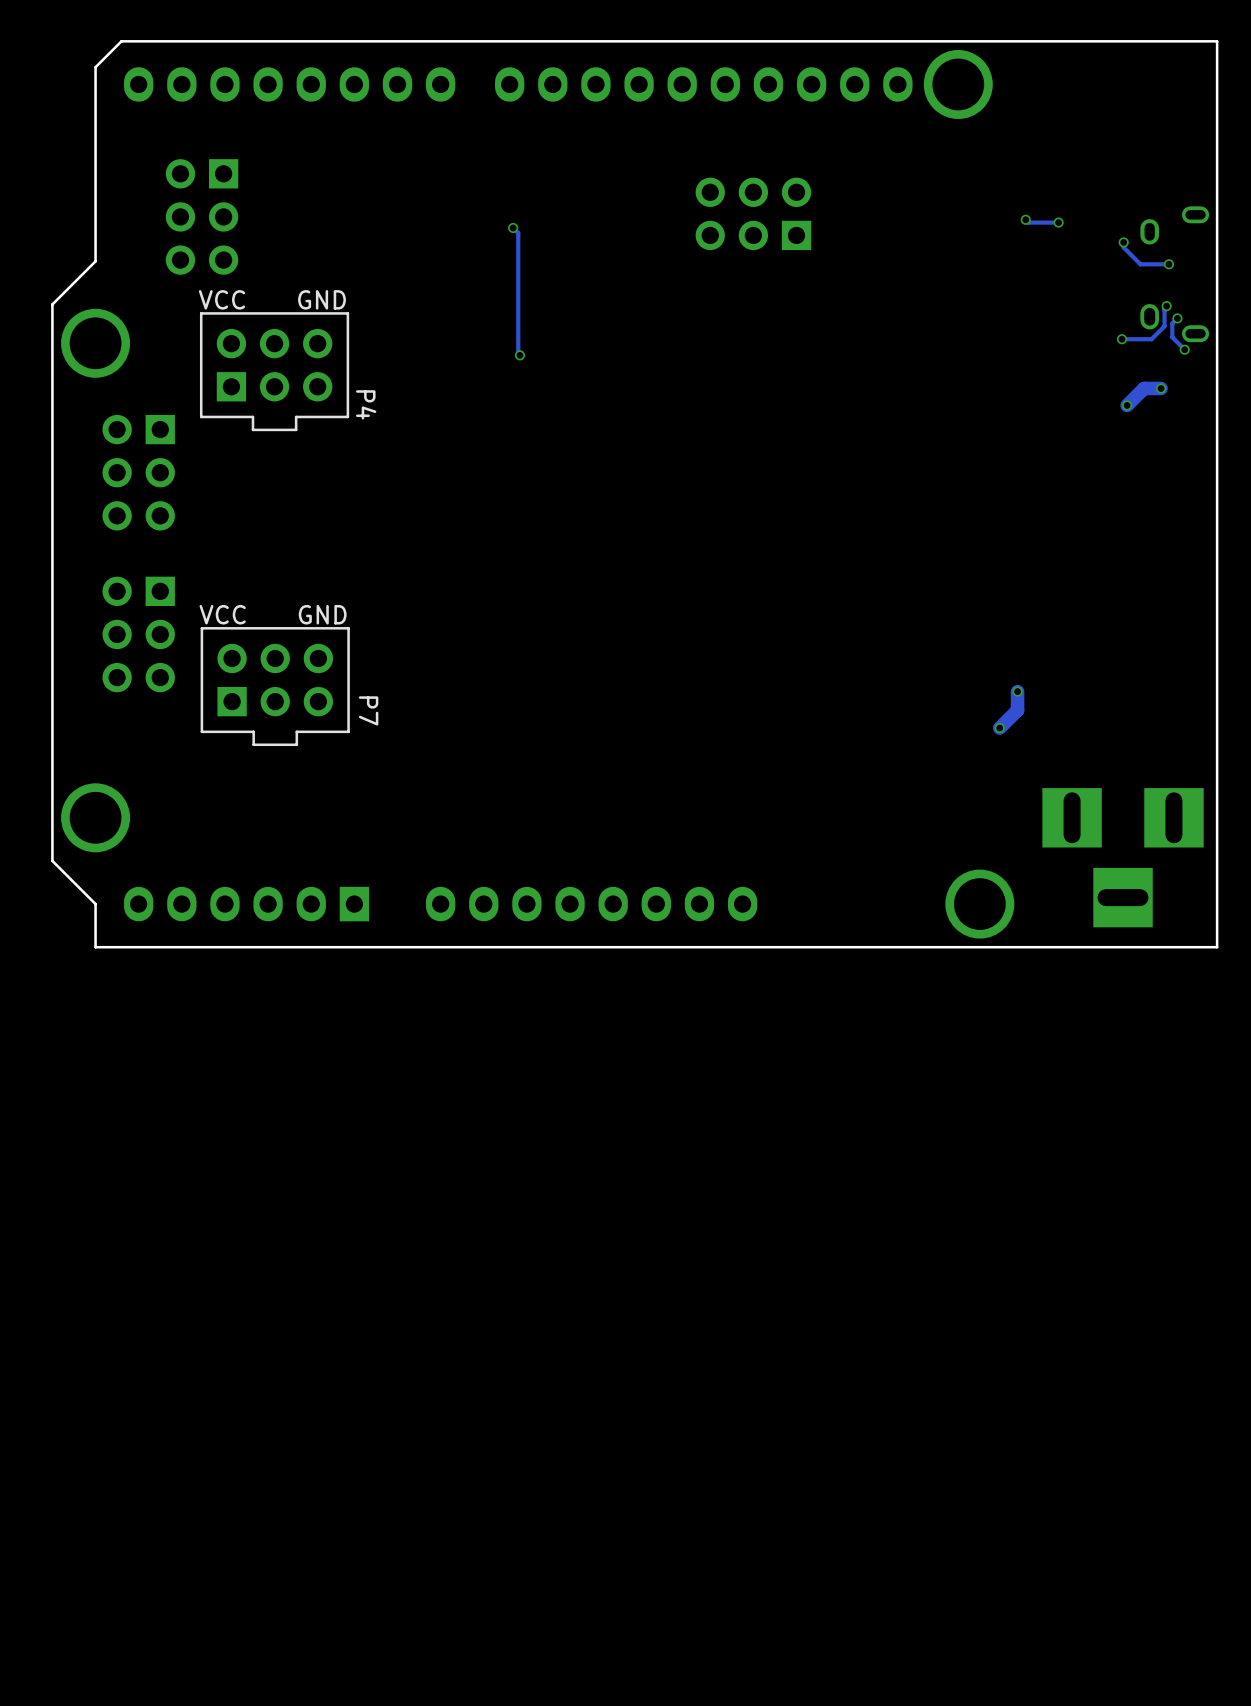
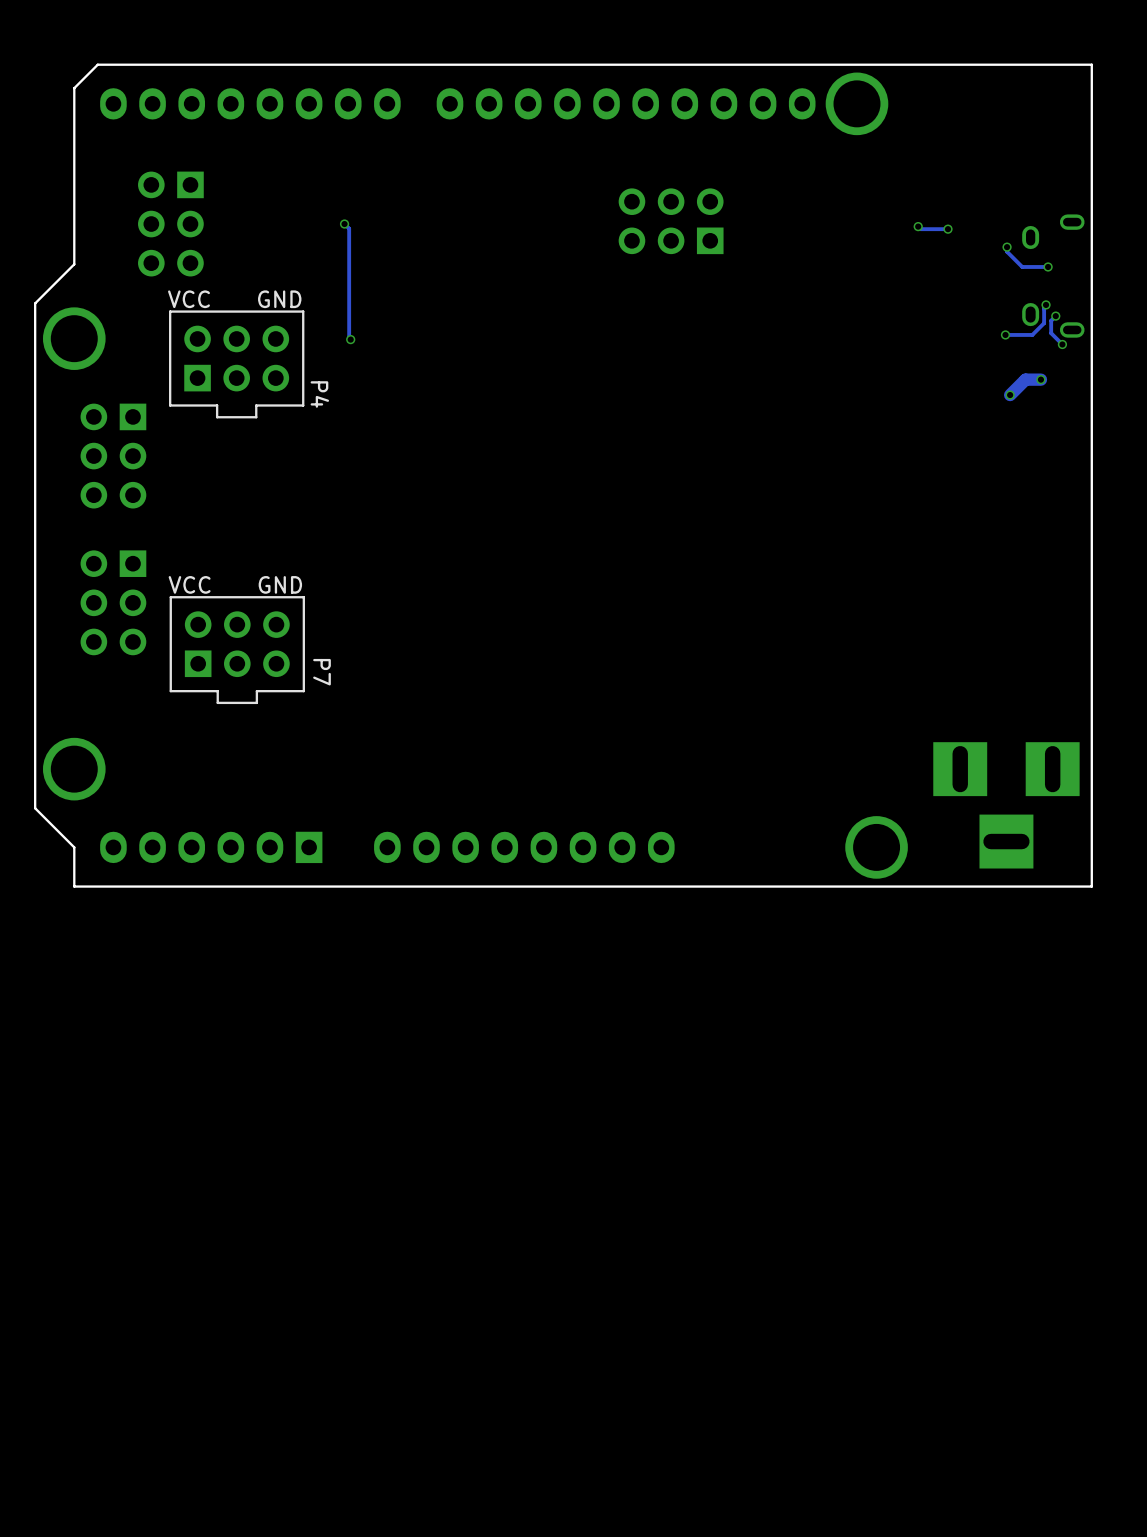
via: none -> (344, 224)
track: (513, 227) (518, 233) (518, 353) (519, 355) -> (344, 224) (349, 228) (349, 338) (350, 339)
via: (513, 227) -> none
via: none -> (350, 339)
via: (519, 355) -> none
track: (1017, 691) (1017, 710) (999, 728) -> none
via: (1017, 691) -> none
via: (999, 728) -> none

